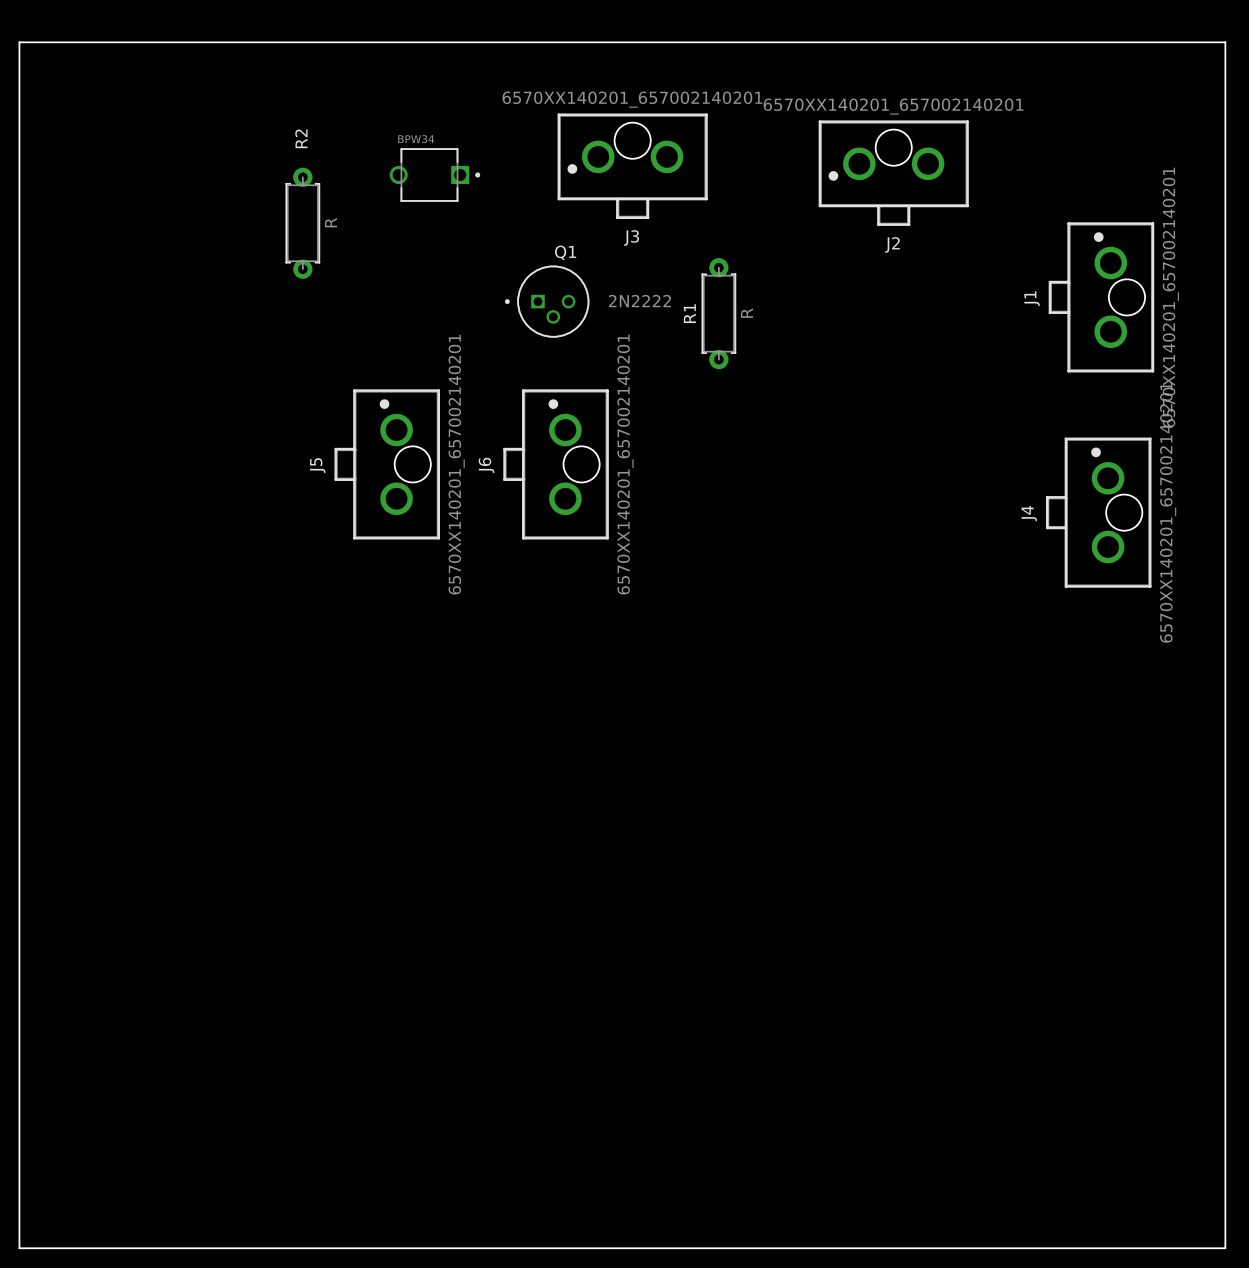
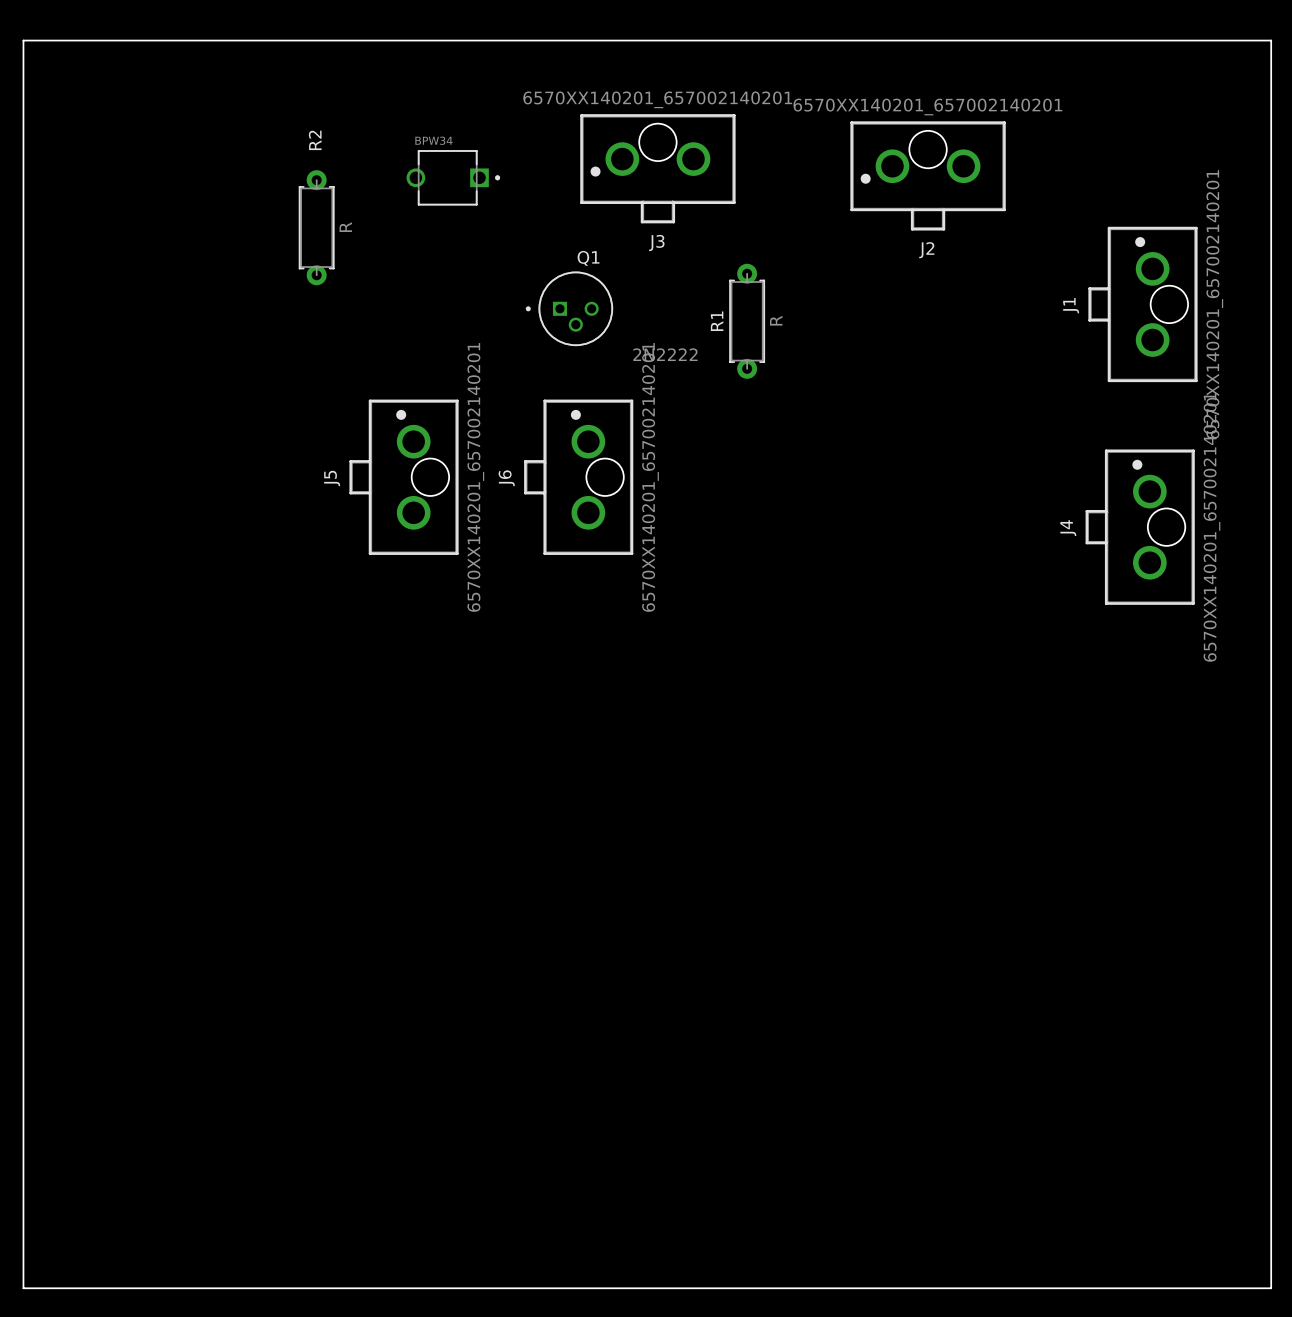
Q1 value position: 2N2222 (639, 301) -> 2N2222 (665, 354)

